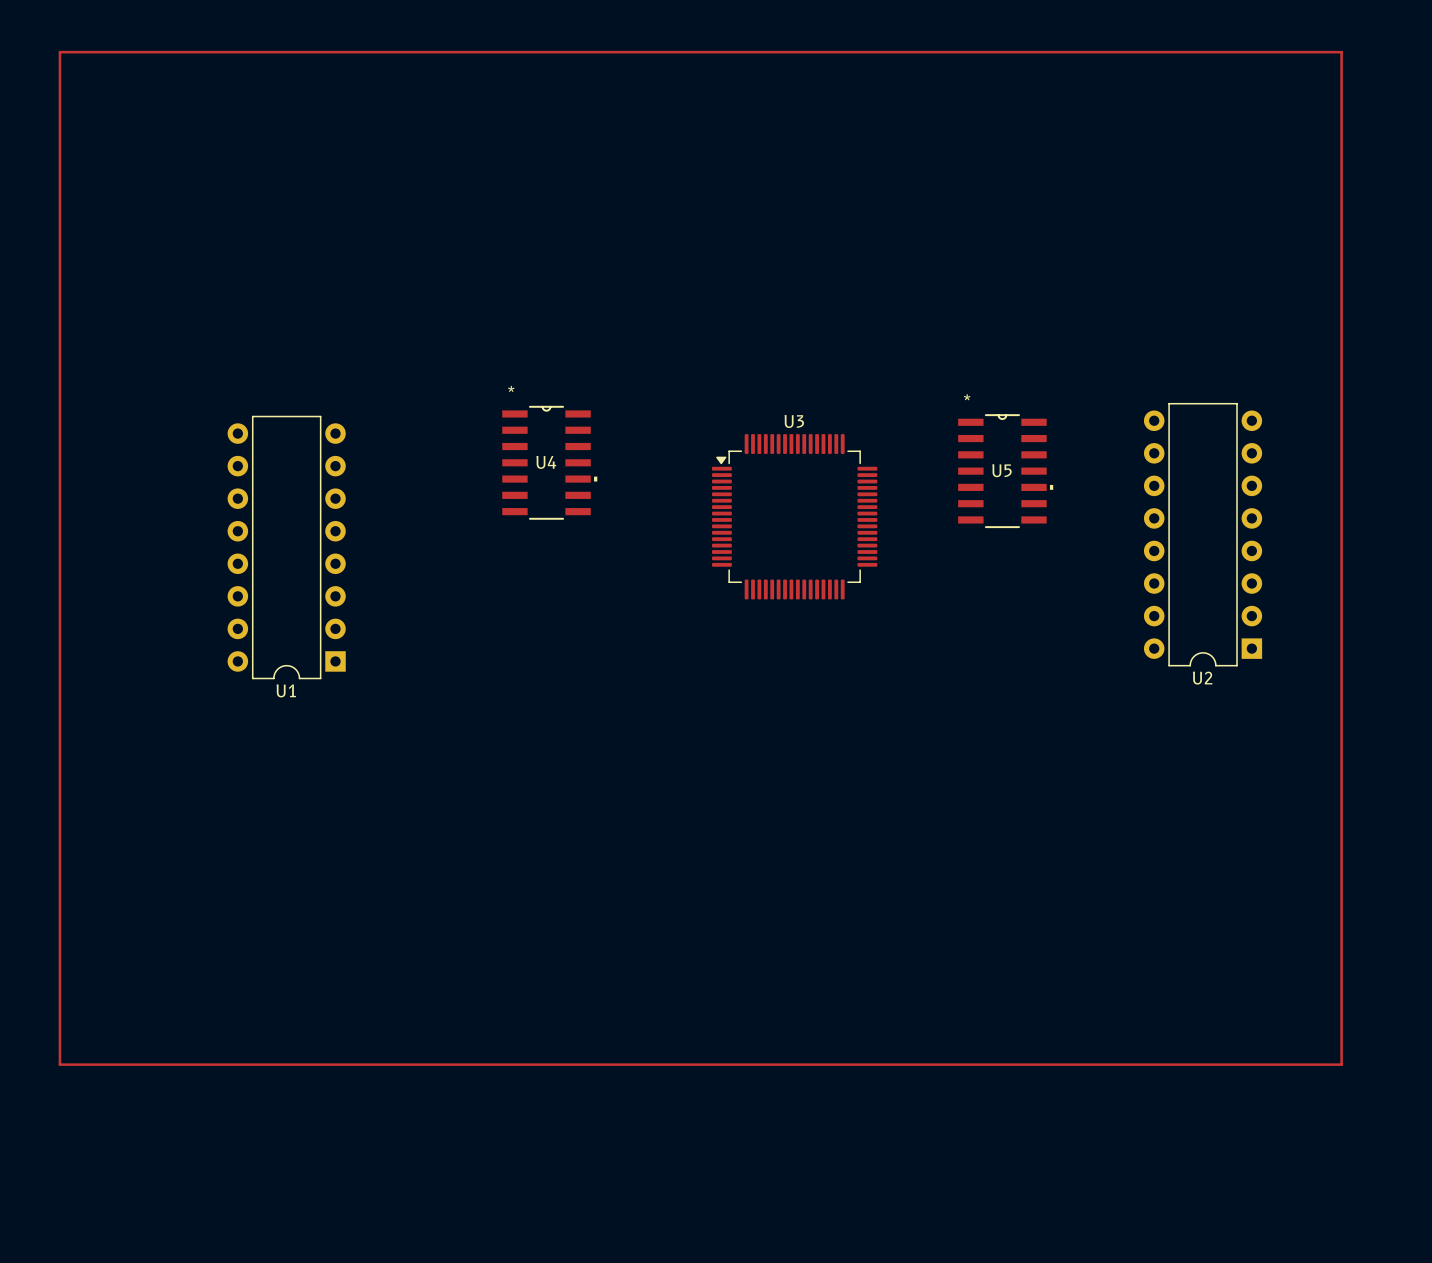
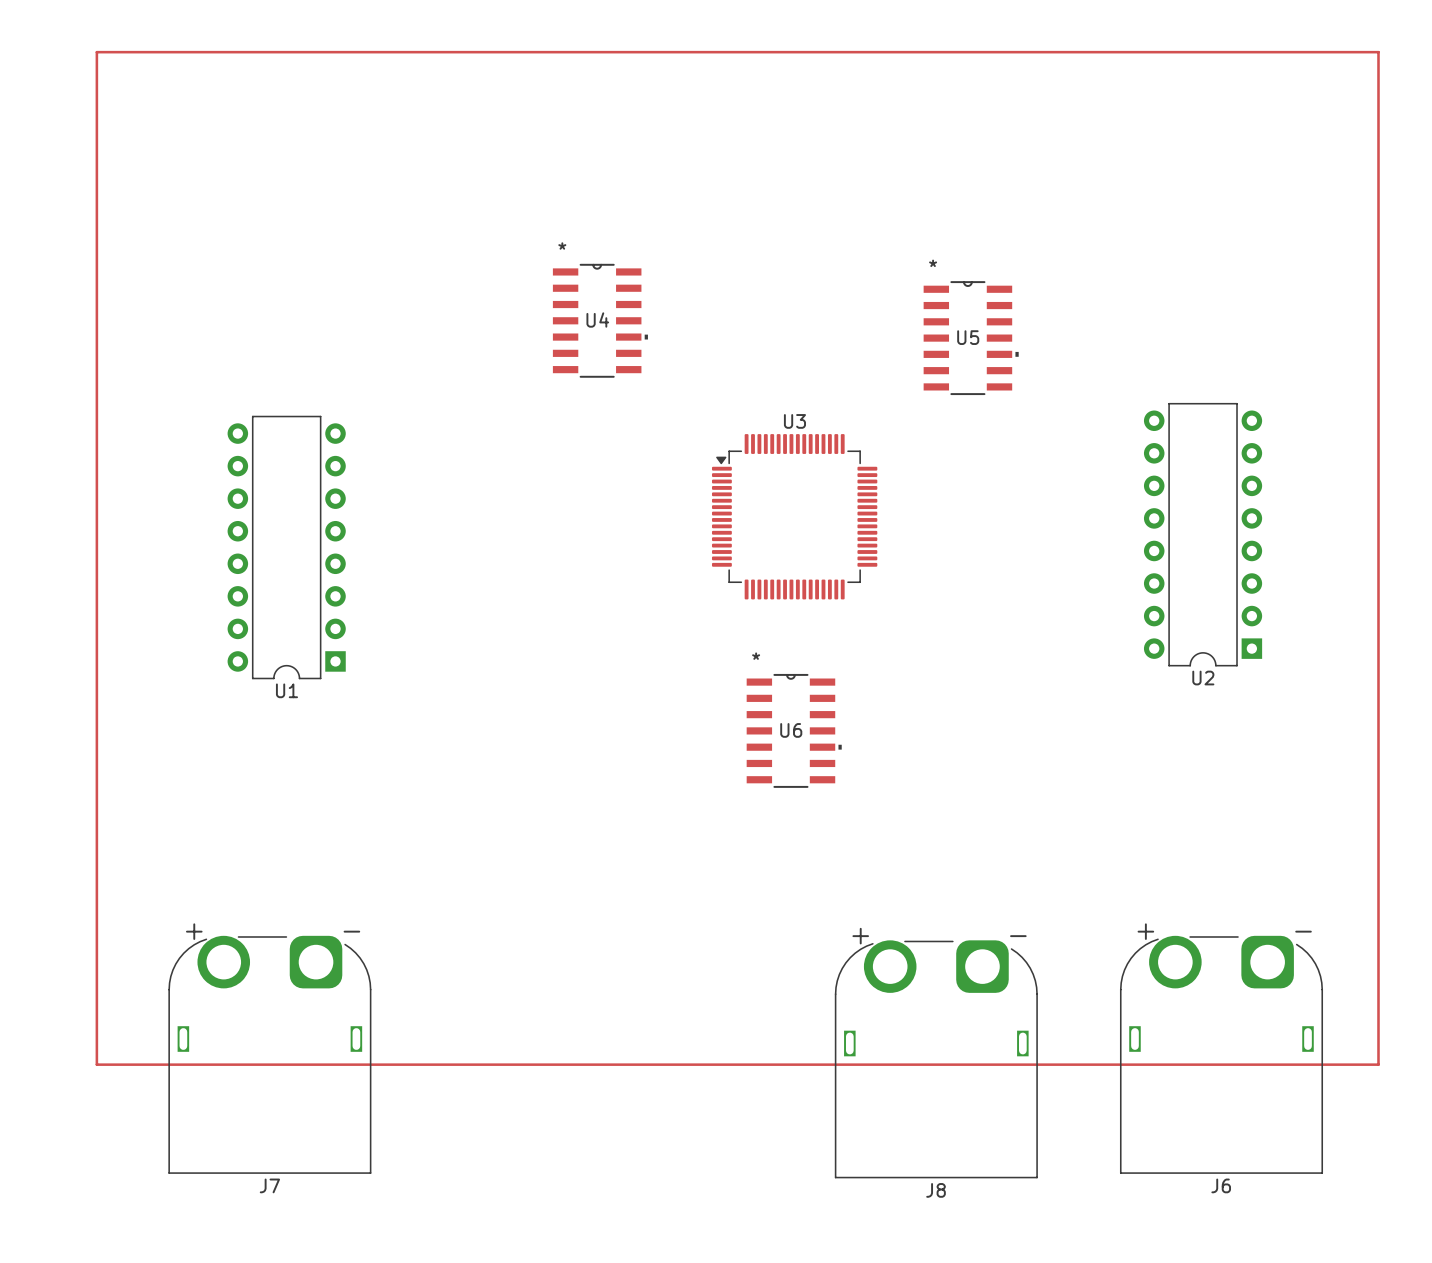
top track: (96, 52) (59, 52) (59, 1064) (96, 1064) -> (96, 52) (96, 1064)
top track: (1341, 52) (1341, 1064) -> (1341, 52) (1378, 52) (1378, 1064) (1341, 1064)
U4 position: (549, 462) -> (600, 320)
U5 position: (1005, 471) -> (971, 338)
U6: none -> (794, 730)
J7: none -> (269, 1054)
J6: none -> (1221, 1054)
J8: none -> (936, 1059)

